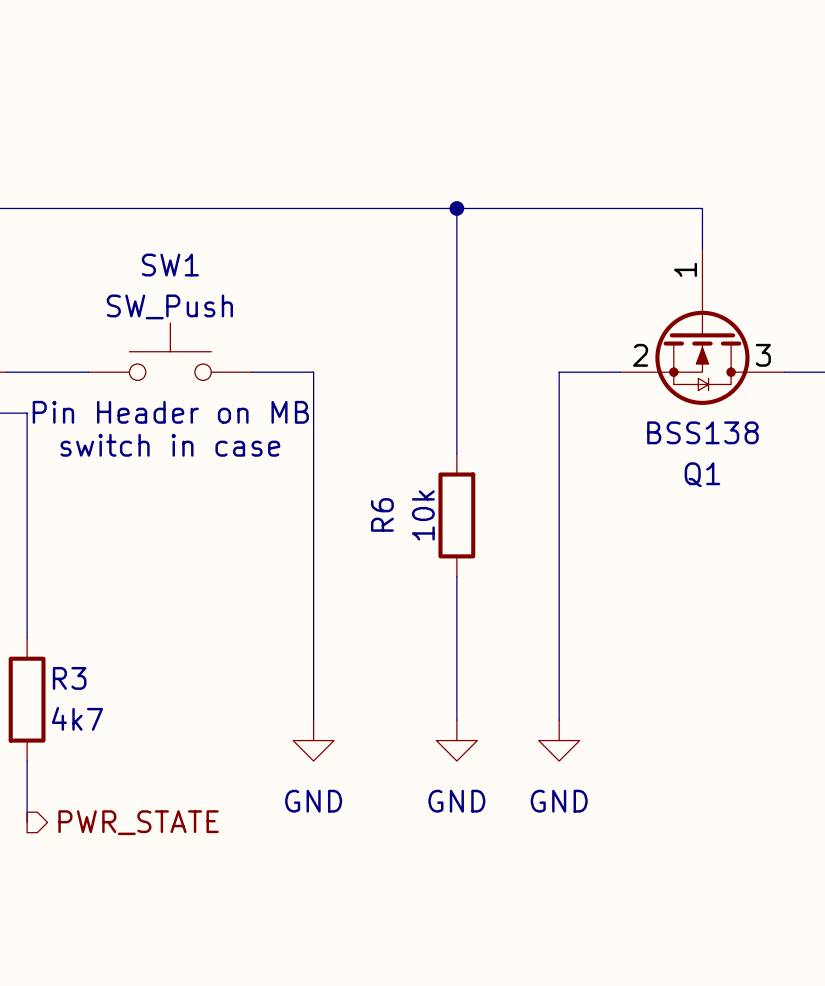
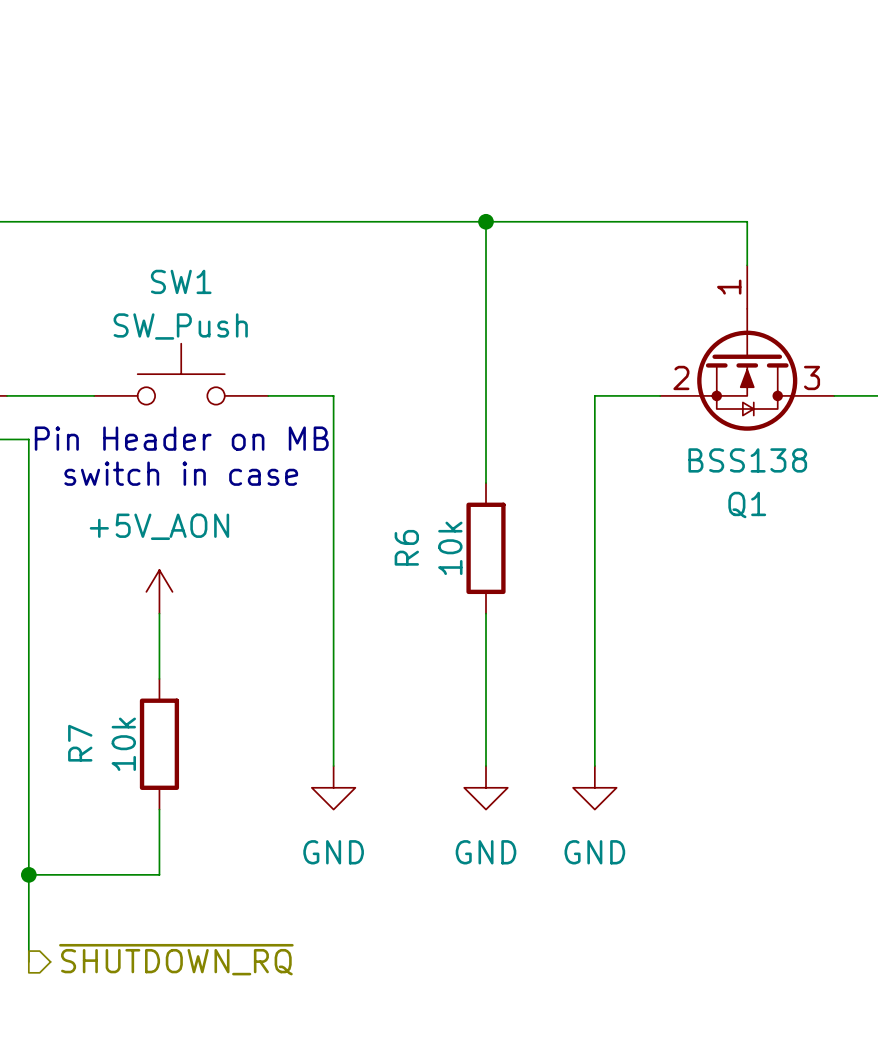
power symbol: none -> +5V_AON (159, 591)
wire: none -> (159, 613) (159, 678)
wire: none -> (28, 678) (28, 809)
R3: 4k7 (27, 699) -> none
R7: none -> 10k (159, 744)
wire: none -> (159, 809) (159, 874) (28, 874) (28, 961)
junction: none -> (28, 874)
hierarchical label: PWR_STATE (138, 822) -> none
hierarchical label: none -> ~{SHUTDOWN_RQ} (176, 959)

